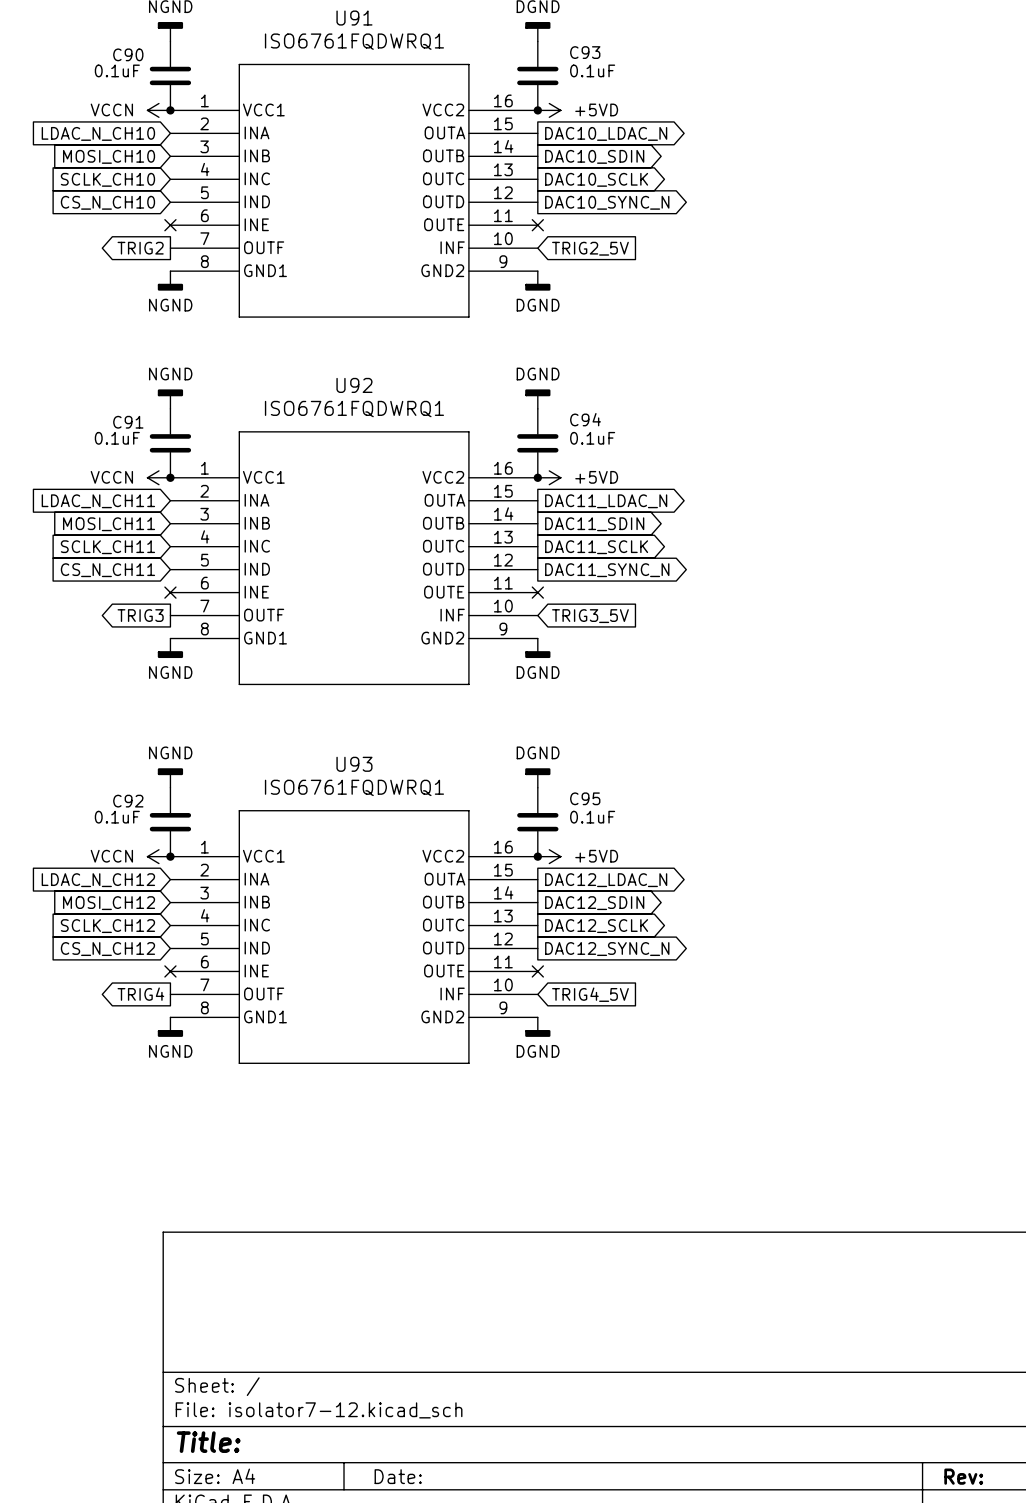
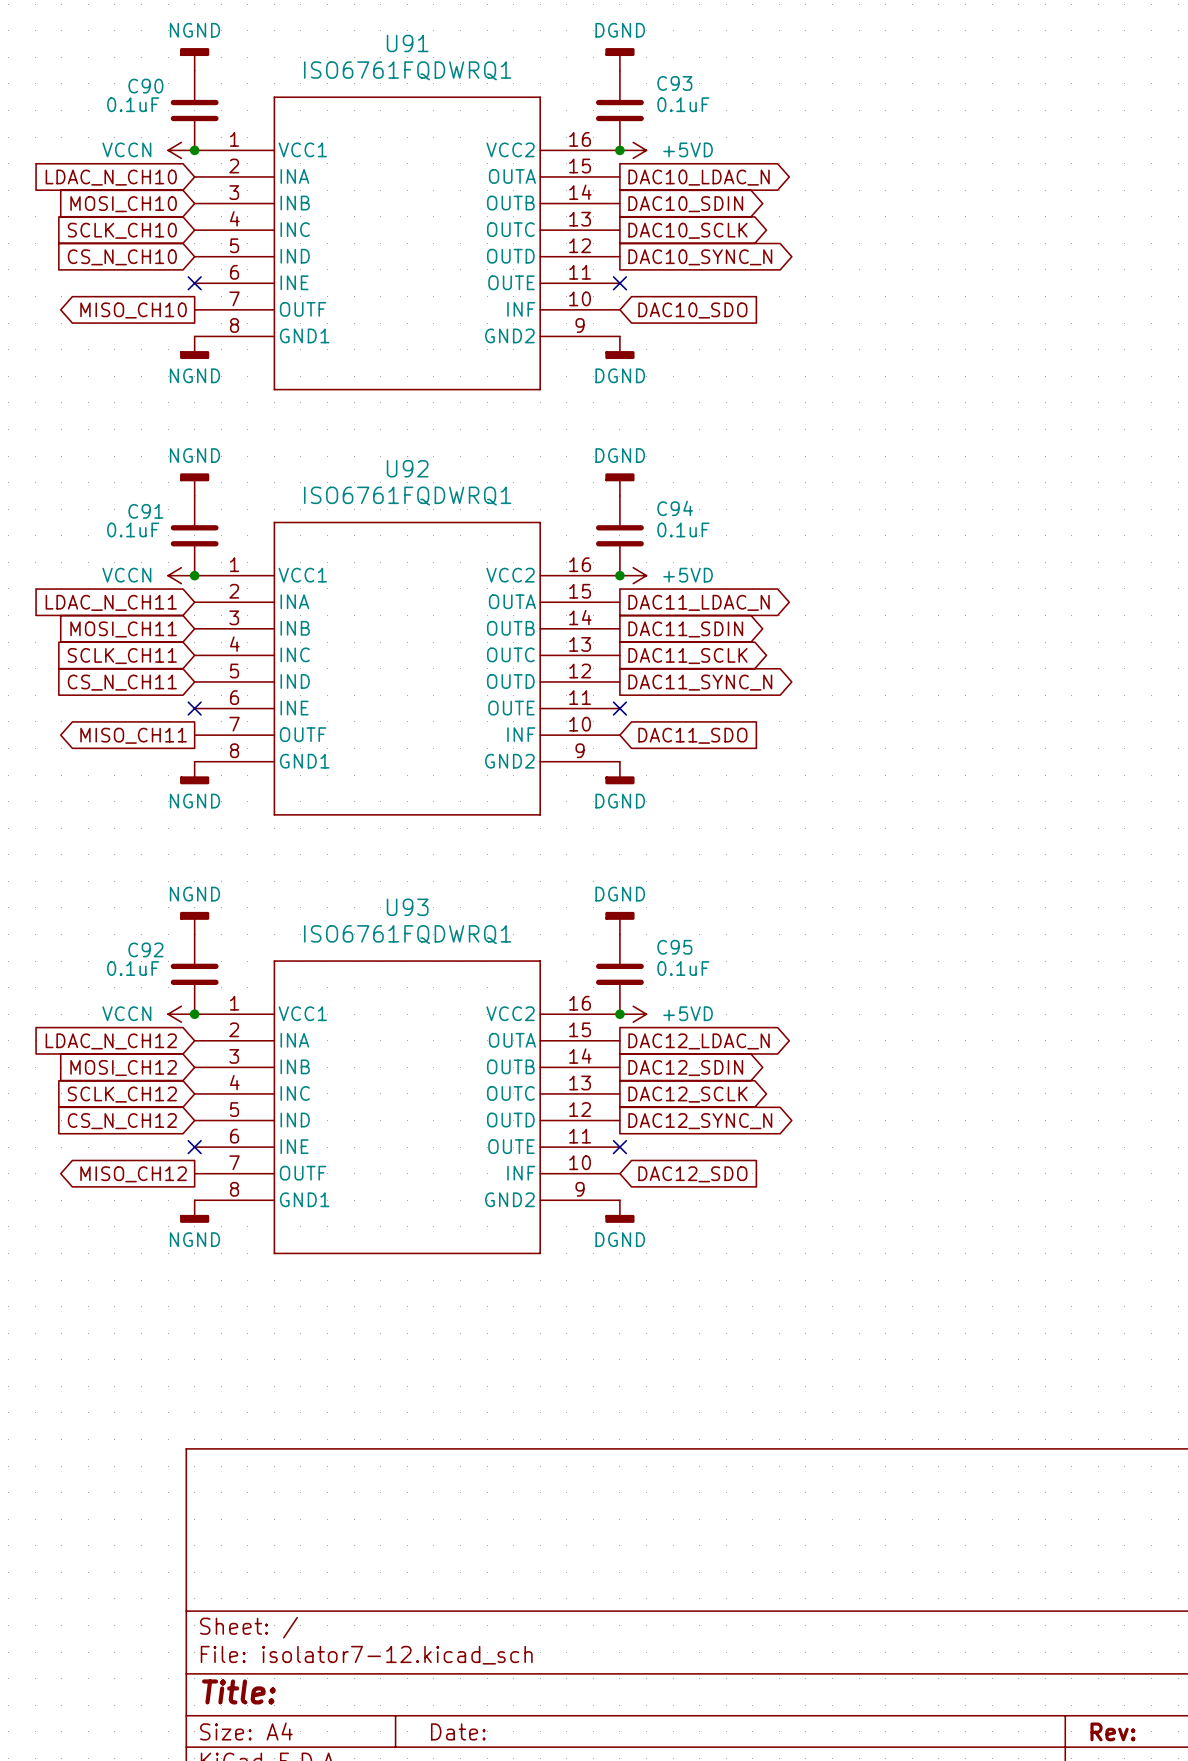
global label: TRIG2 (140, 248) -> MISO_CH10 (133, 310)
global label: TRIG2_5V (590, 248) -> DAC10_SDO (692, 310)
global label: TRIG3 (140, 615) -> MISO_CH11 (133, 735)
global label: TRIG3_5V (590, 616) -> DAC11_SDO (692, 735)
global label: TRIG4 (140, 994) -> MISO_CH12 (133, 1174)
global label: TRIG4_5V (590, 994) -> DAC12_SDO (692, 1174)

